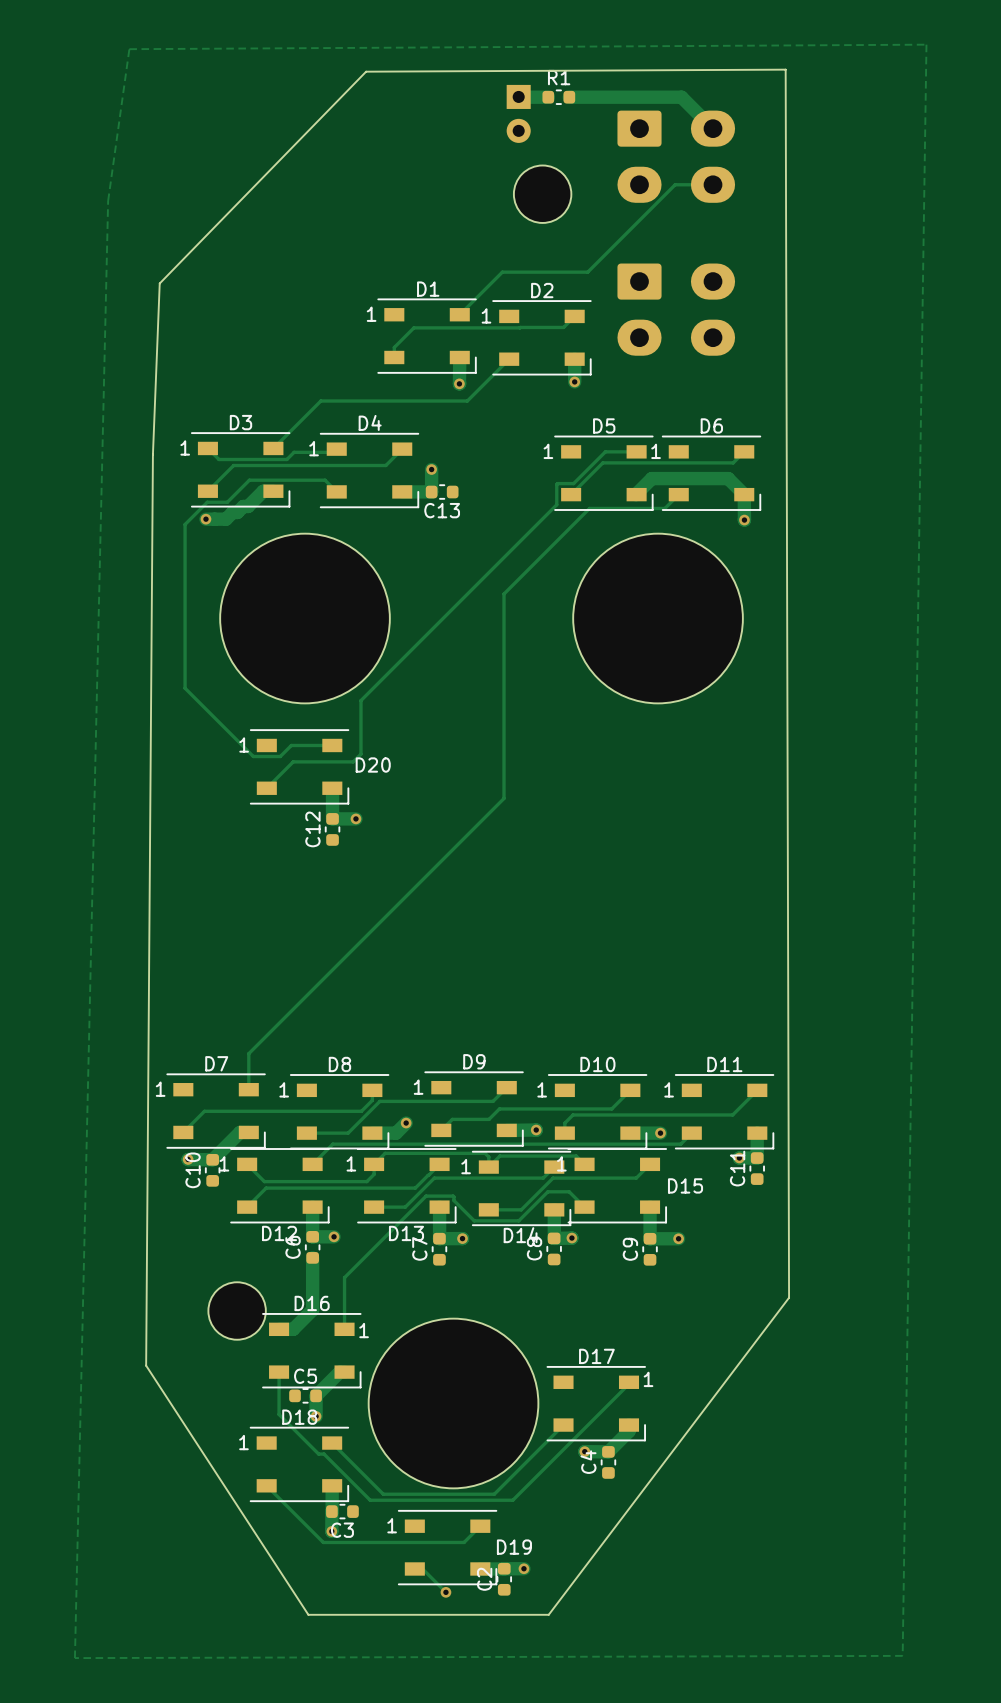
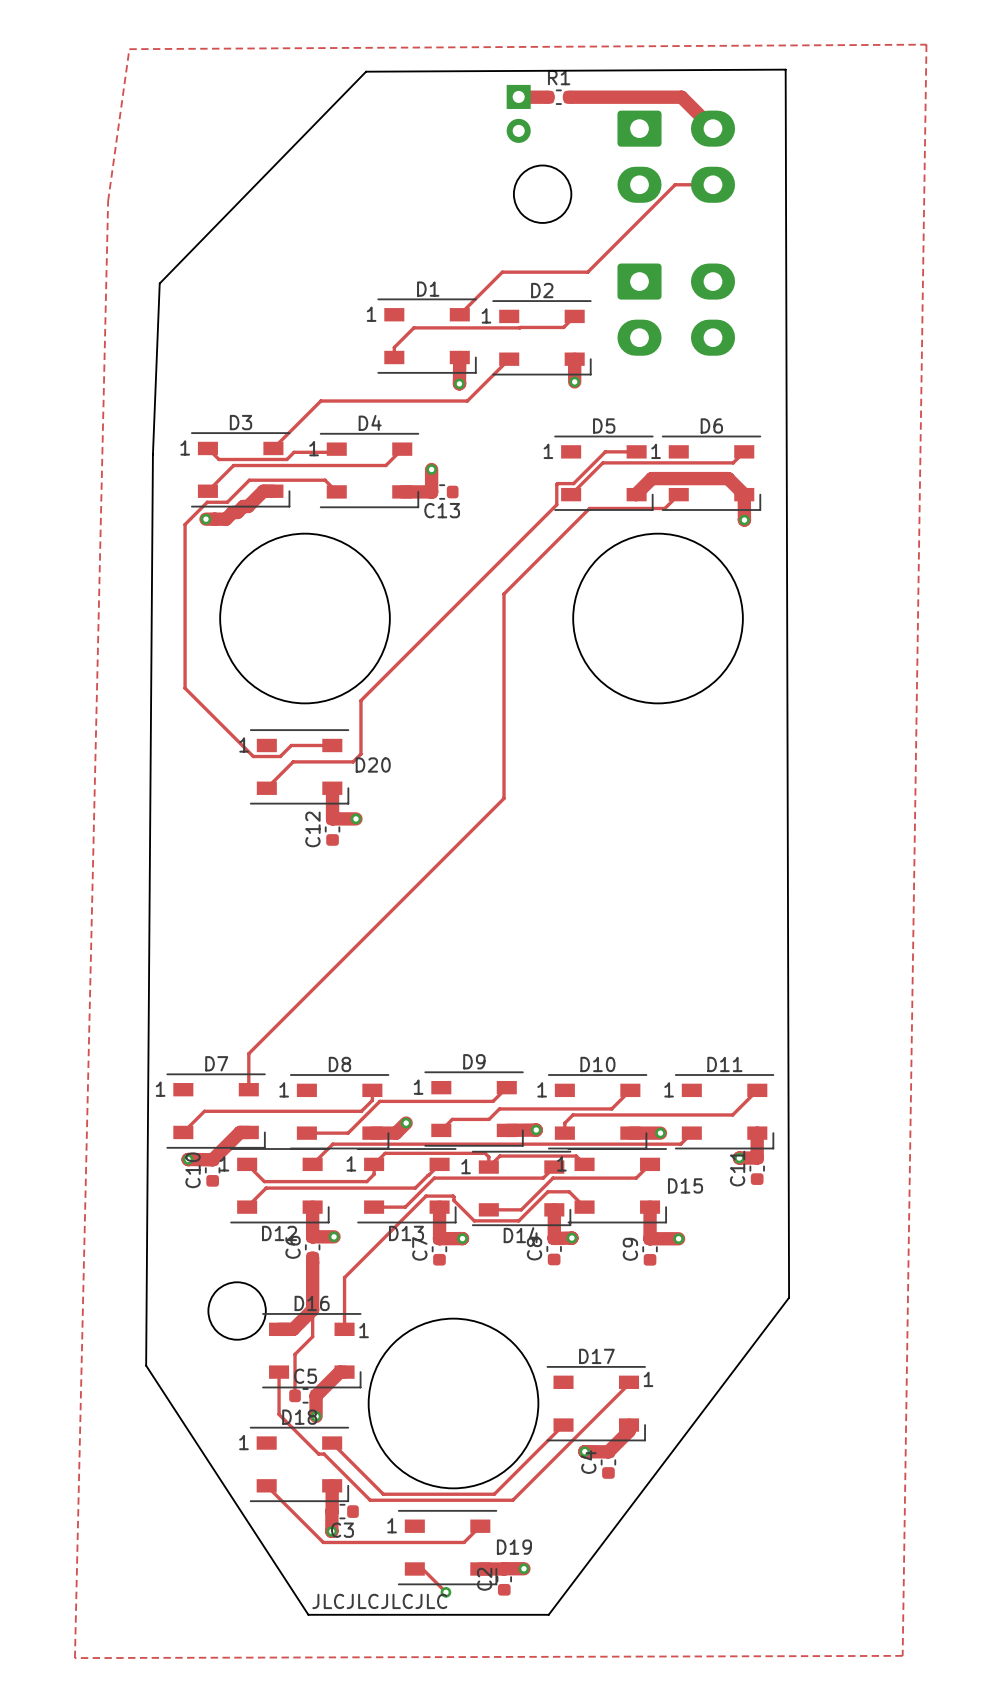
track: none -> (312, 1262) (312, 1336) (295, 1354) (295, 1395)
text: none -> JLCJLCJLCJLC (379, 1601)

